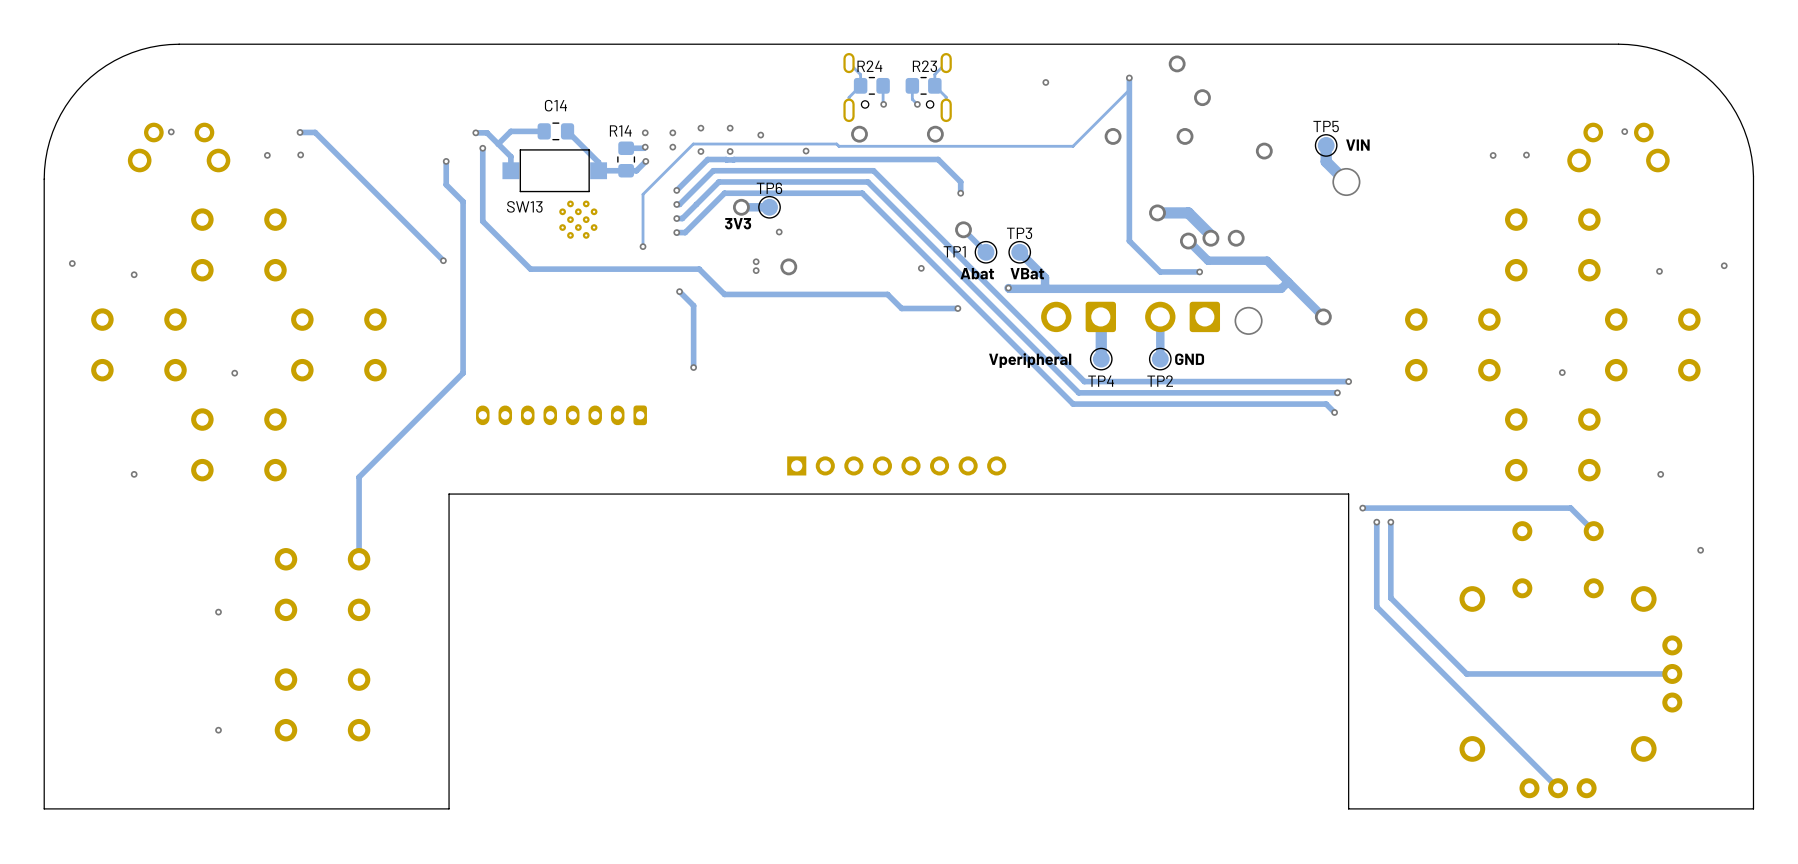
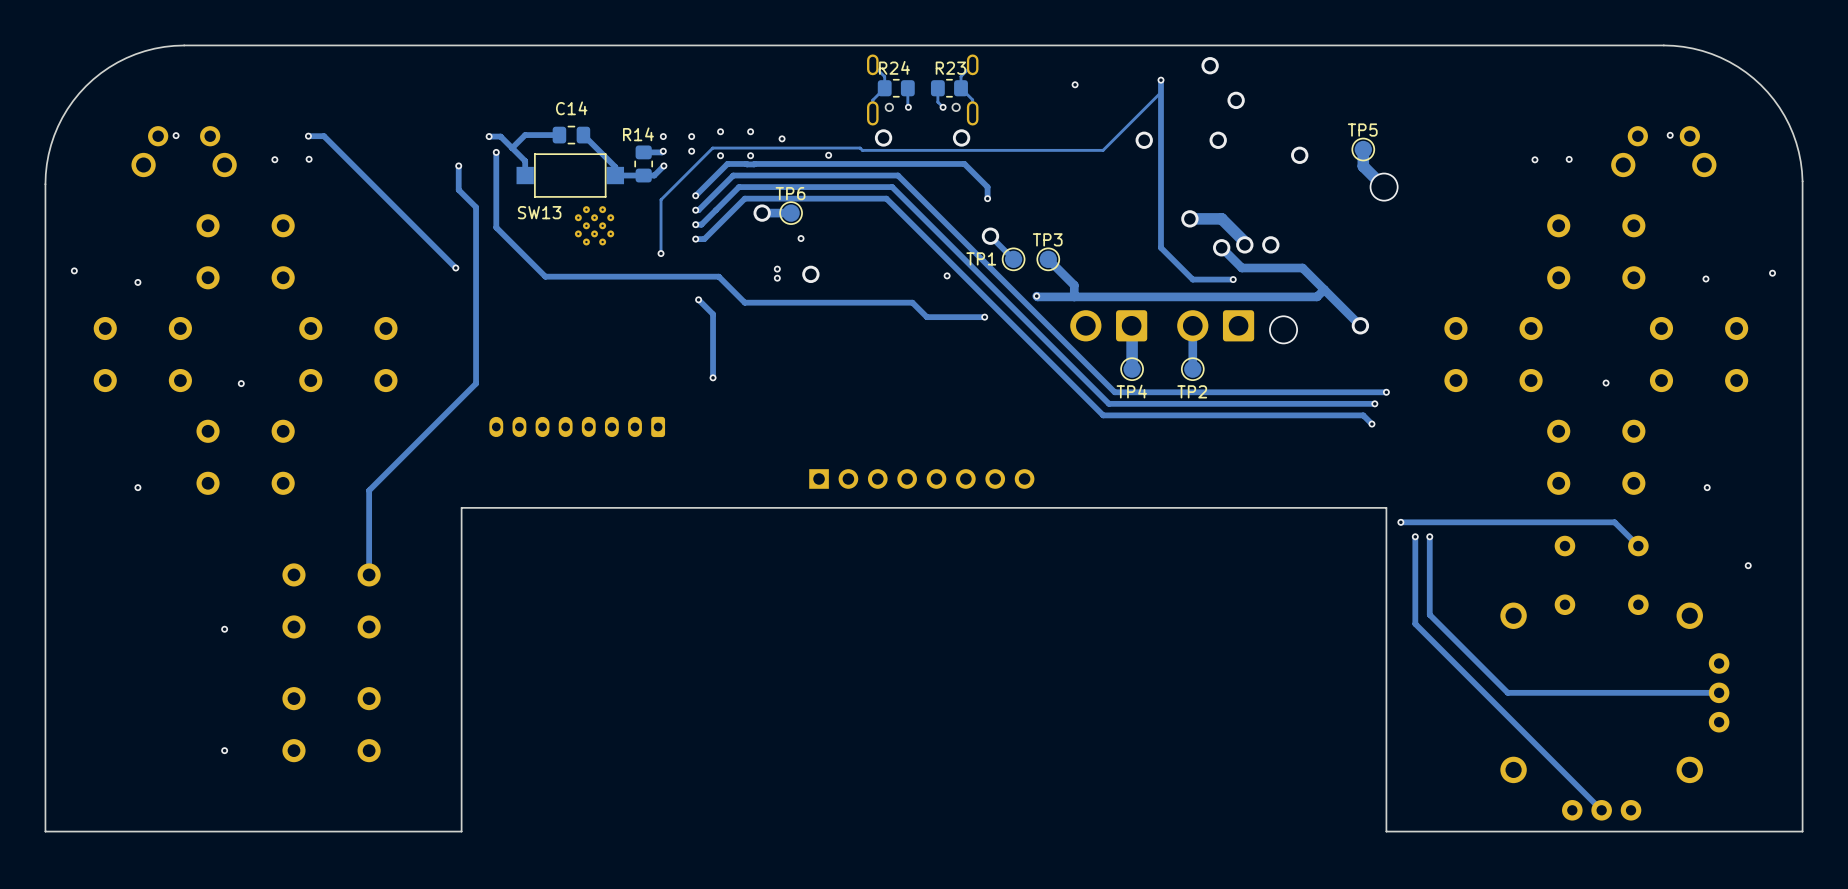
text: VIN (1357, 145) -> none
text: 3V3 (738, 223) -> none
text: Abat (977, 273) -> none
text: VBat (1027, 273) -> none
text: GND (1189, 359) -> none
text: Vperipheral (1030, 360) -> none

